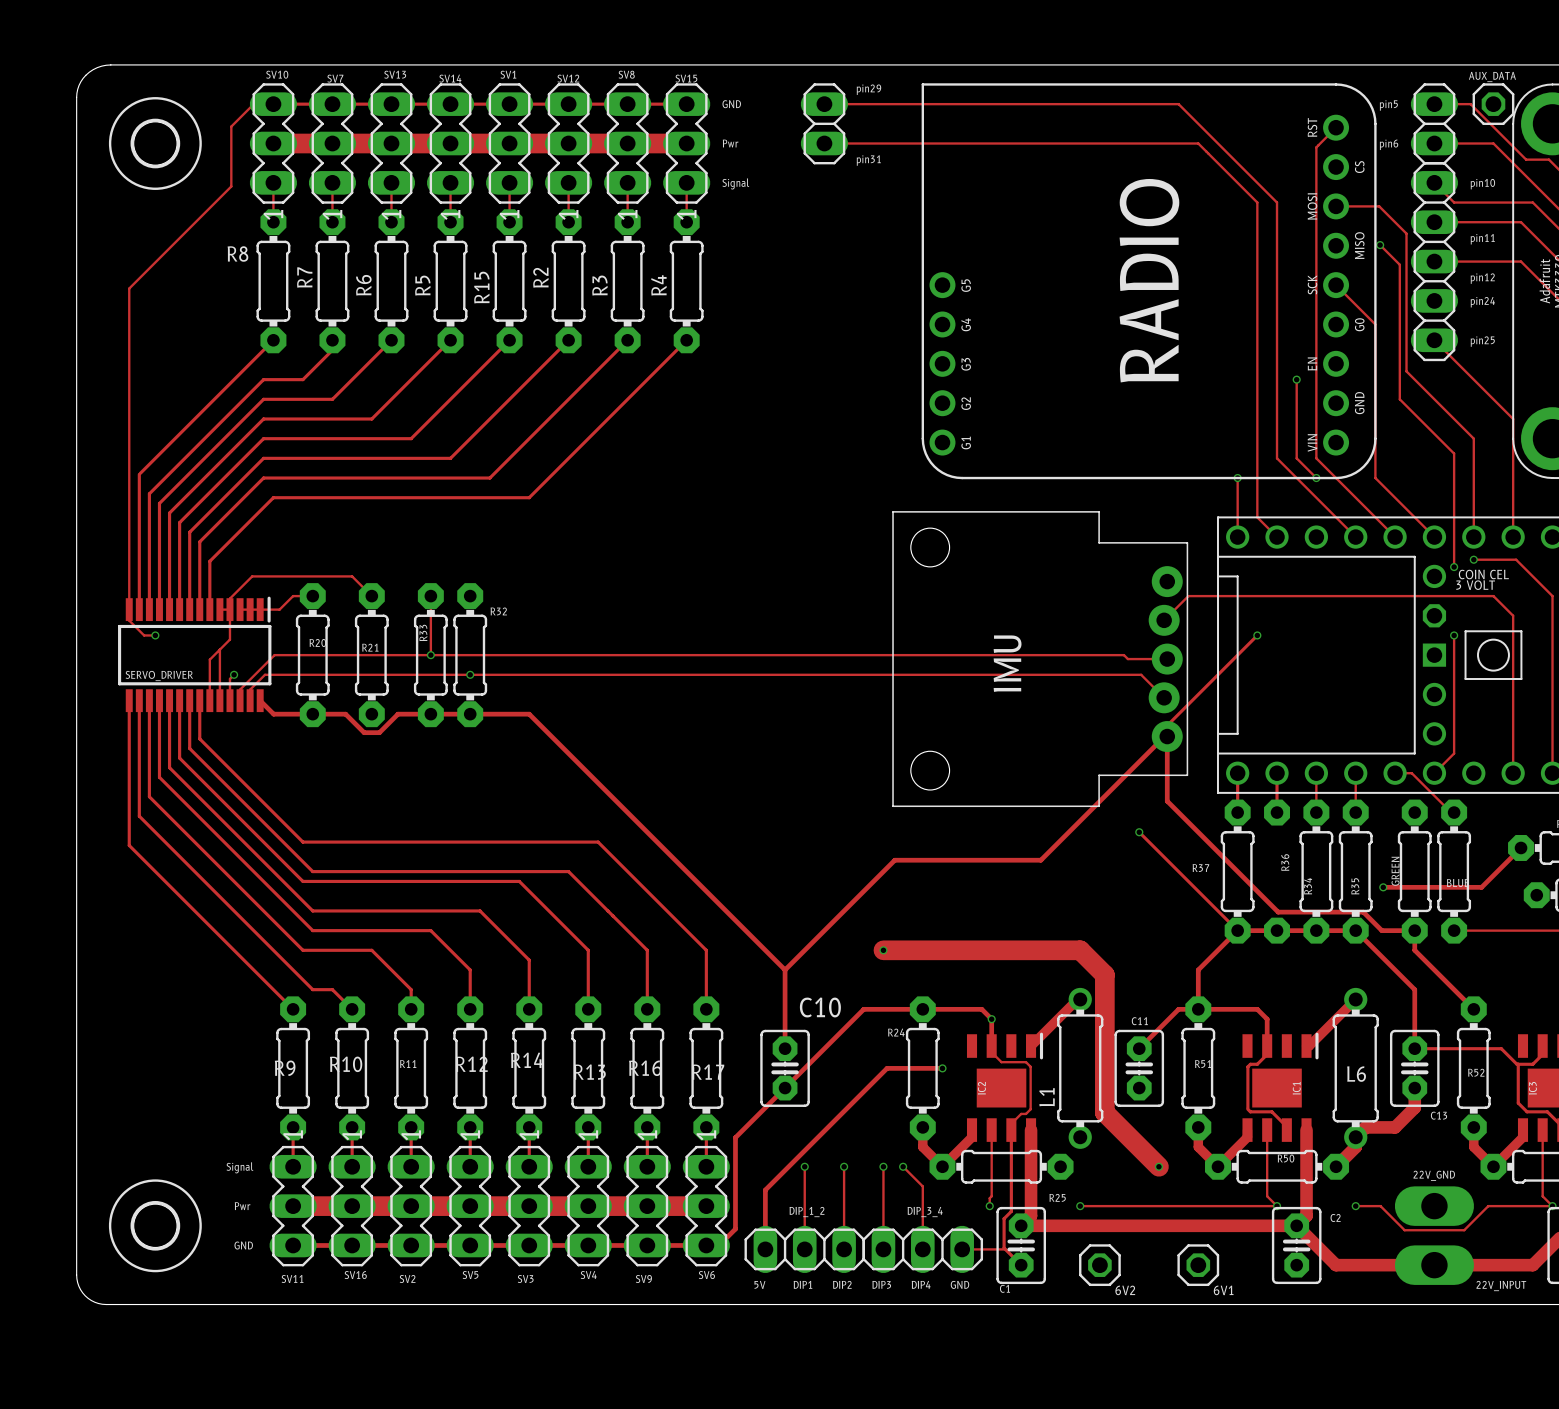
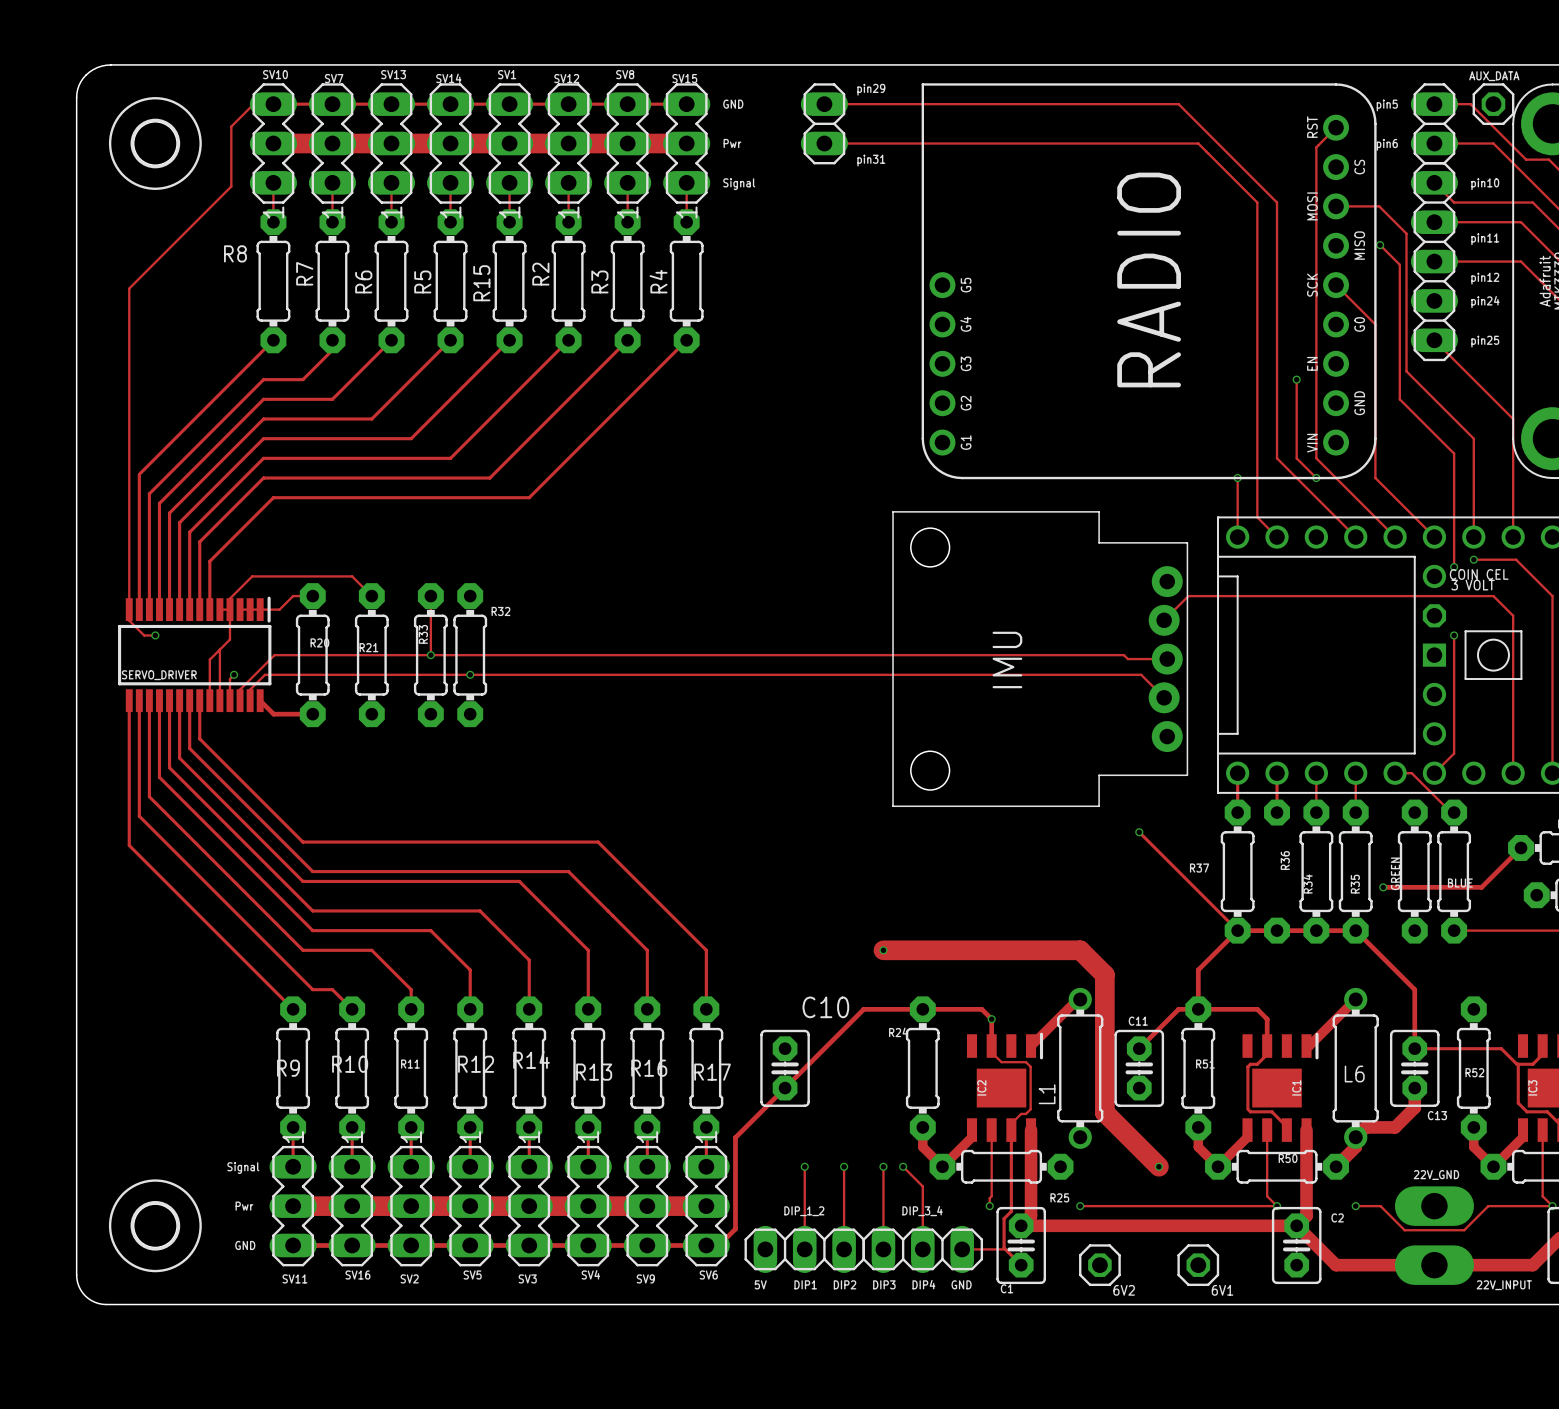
track: (1257, 635) (1167, 725) (1167, 801) -> none
via: (1257, 635) -> none
track: (312, 714) (345, 714) (364, 732) (379, 732) (397, 714) (529, 714) (785, 969) -> none
track: (1167, 801) (1278, 912) (1363, 912) (1381, 930) (1414, 930) (1414, 950) (1473, 1009) -> none
track: (1167, 801) (1167, 733) (1040, 860) (894, 860) (785, 969) -> none
track: (785, 969) (785, 1048) -> none
track: (942, 1068) (887, 1068) (765, 1190) (765, 1249) -> none
via: (942, 1068) -> none

